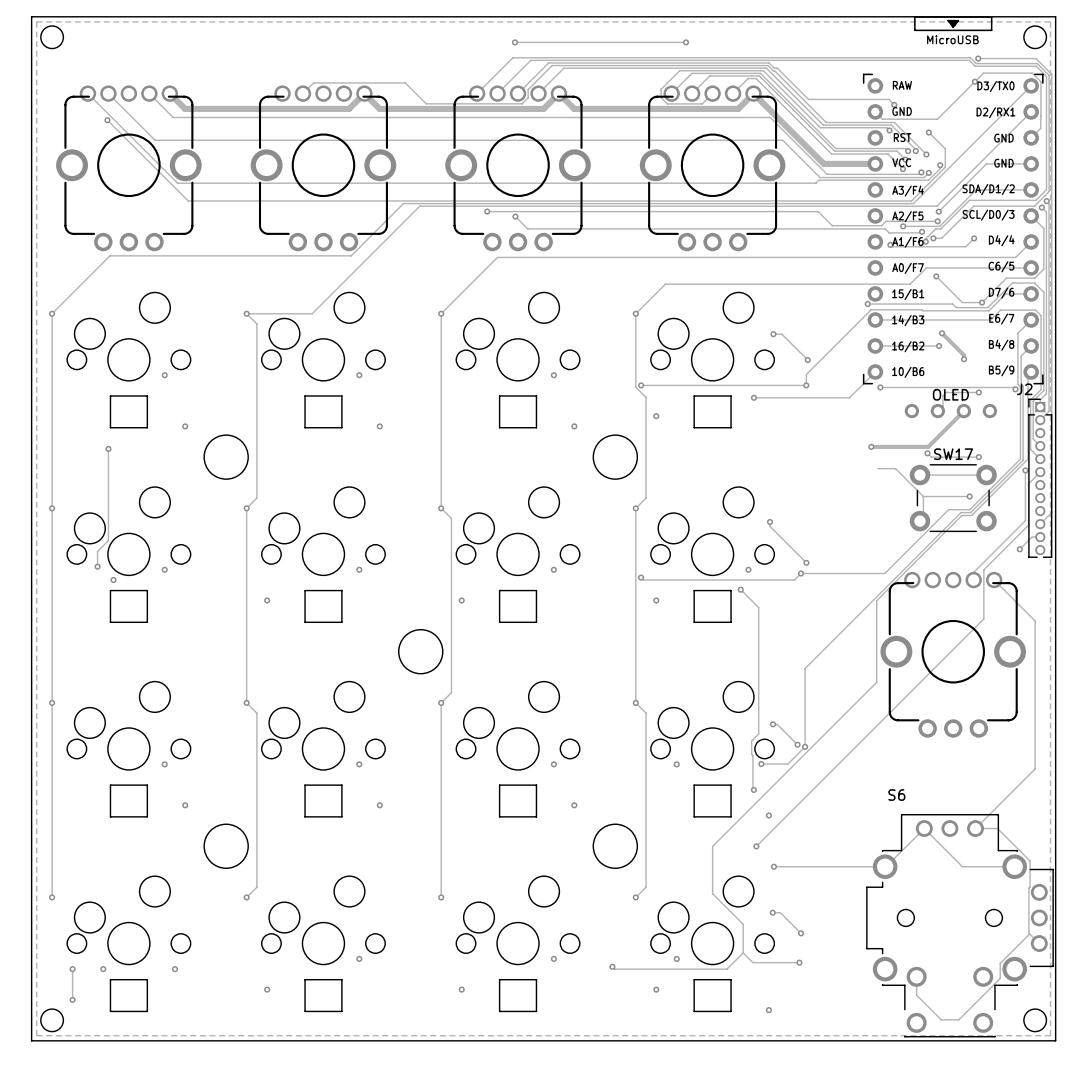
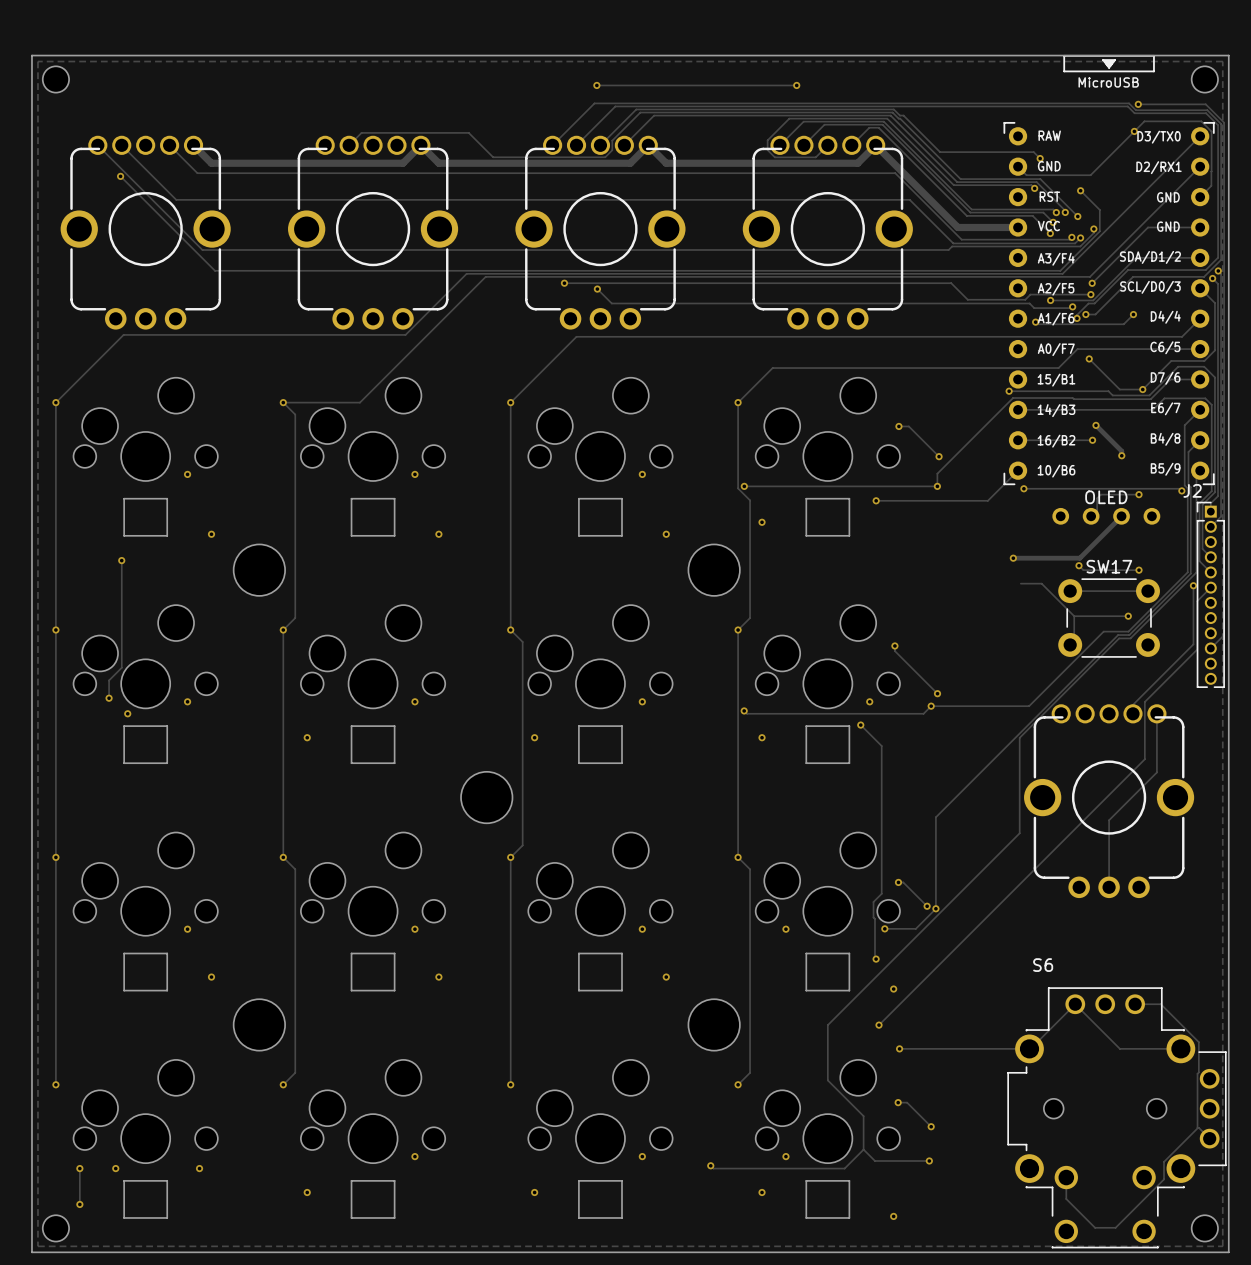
track: (1040, 537) (1031, 537) (1019, 549) -> none
via: (1019, 549) -> none
track: (994, 580) (1035, 621) (1035, 768) (975, 828) -> (1156, 713) (1156, 772) (1109, 820) (1109, 887)

